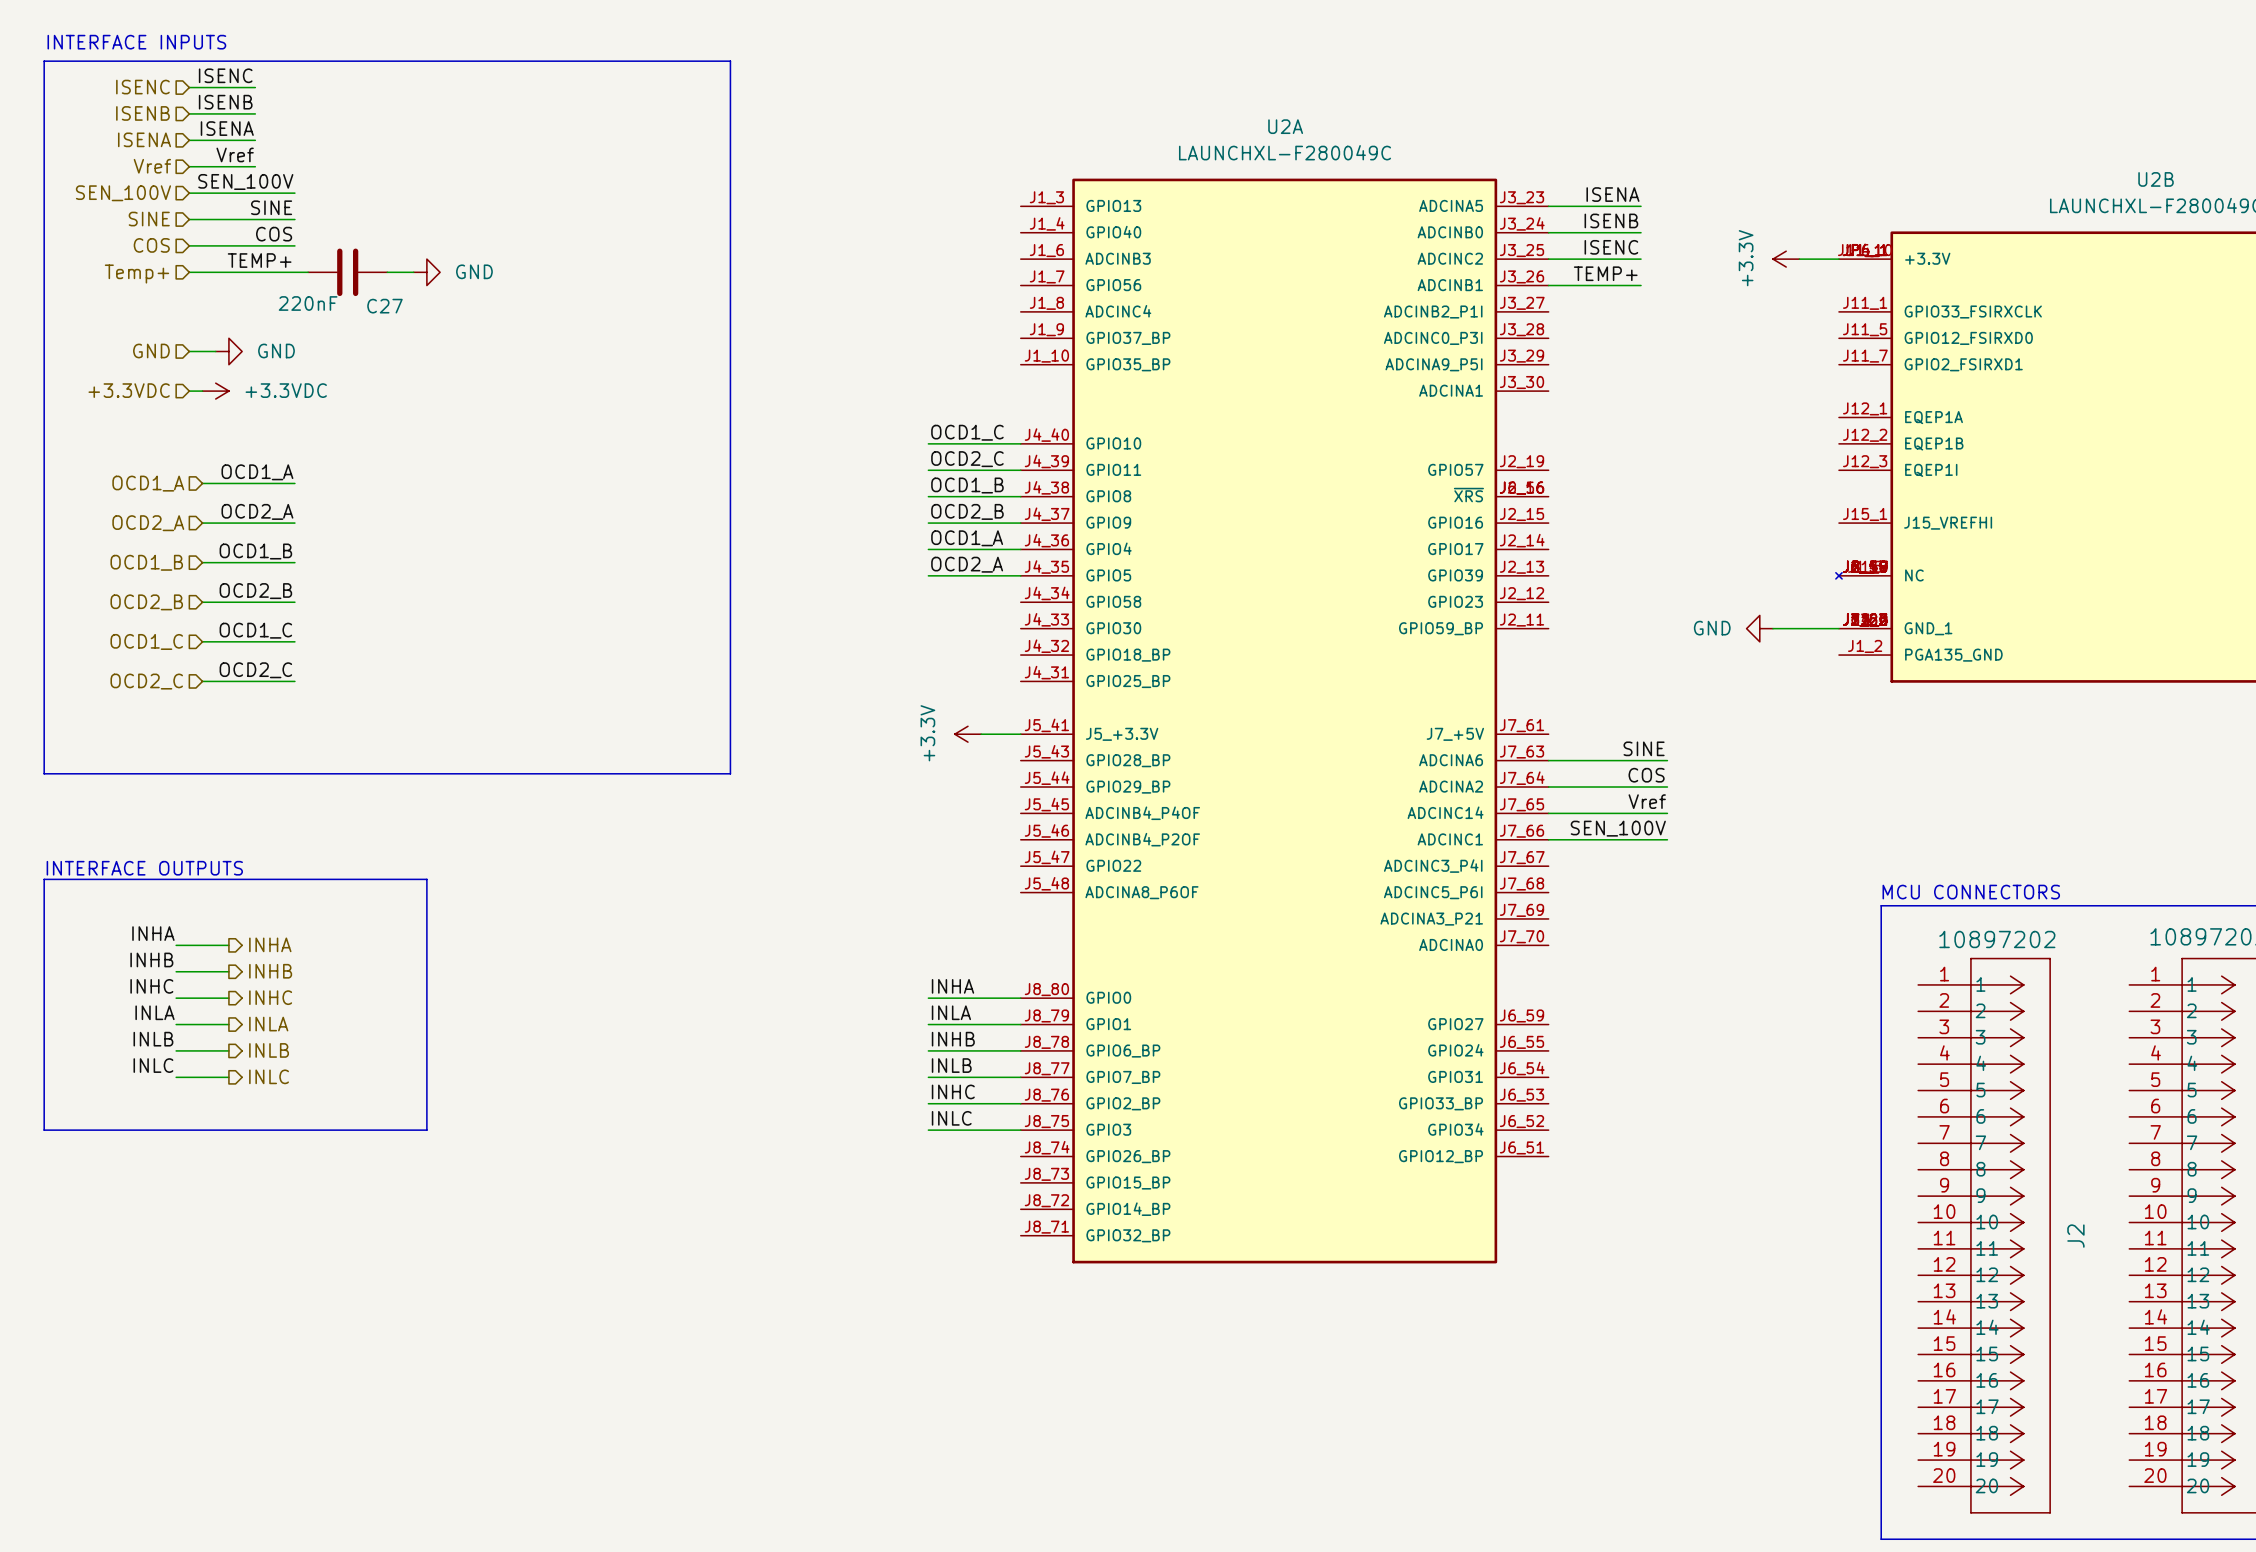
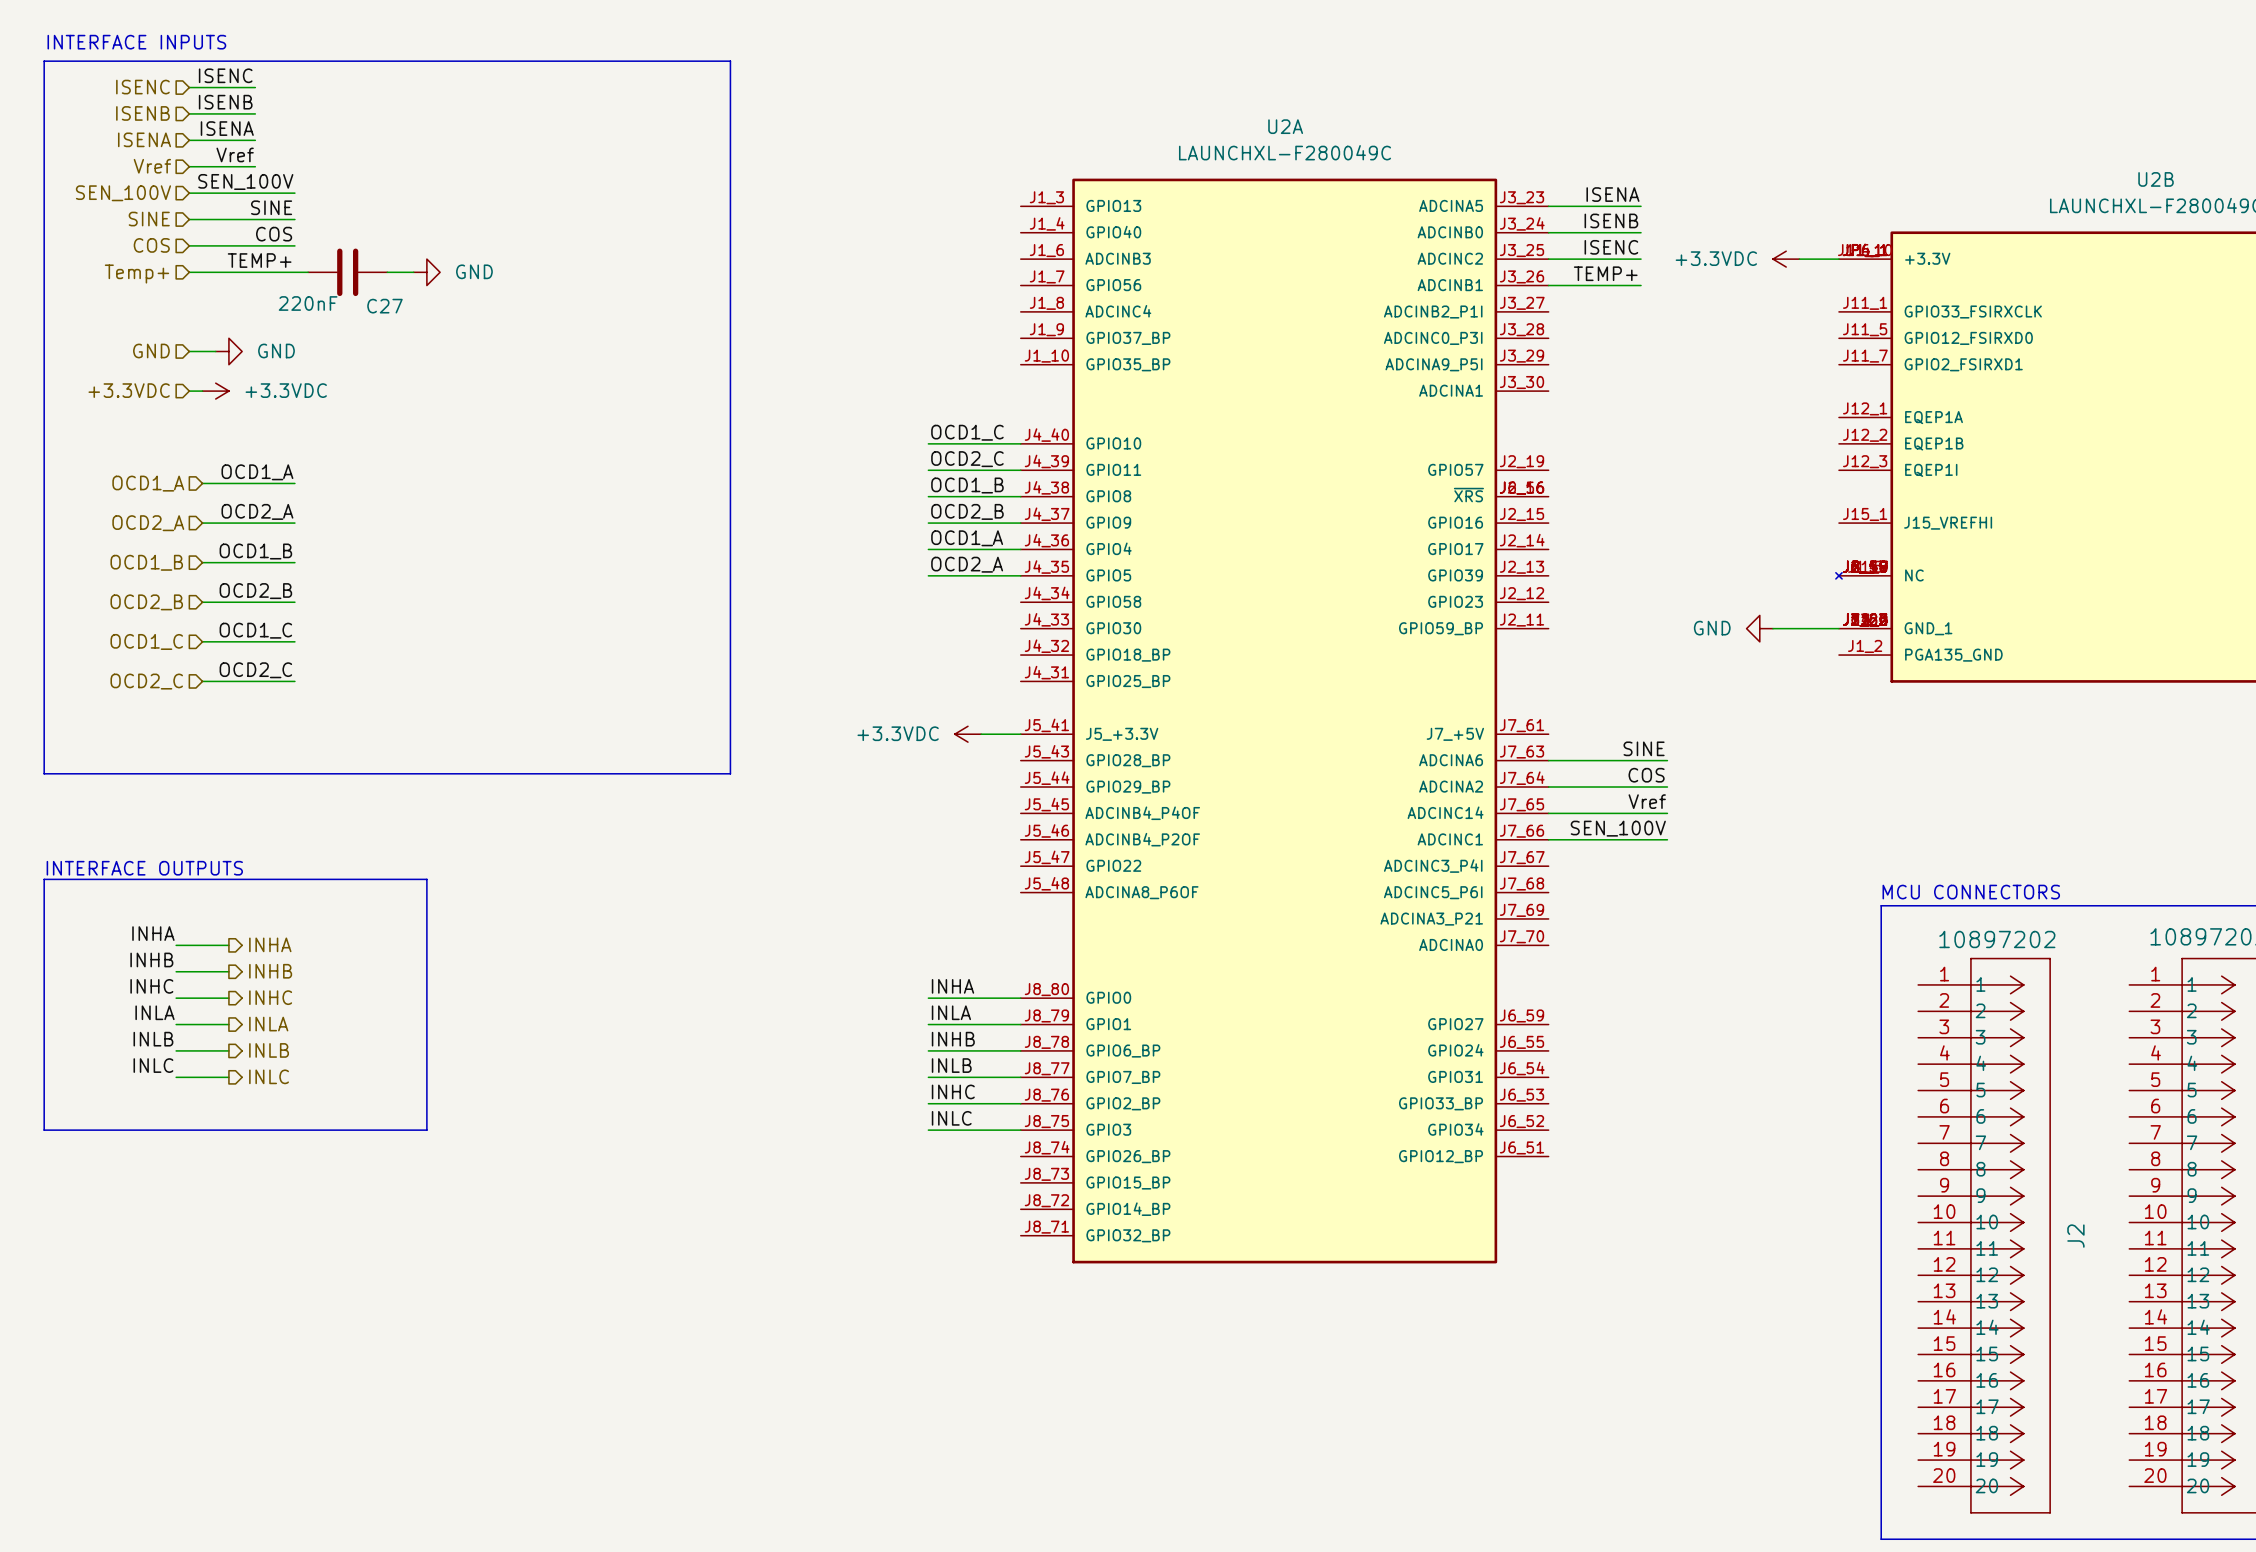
power symbol: +3.3V (1786, 259) -> +3.3VDC (1786, 259)
power symbol: +3.3V (967, 734) -> +3.3VDC (967, 734)

